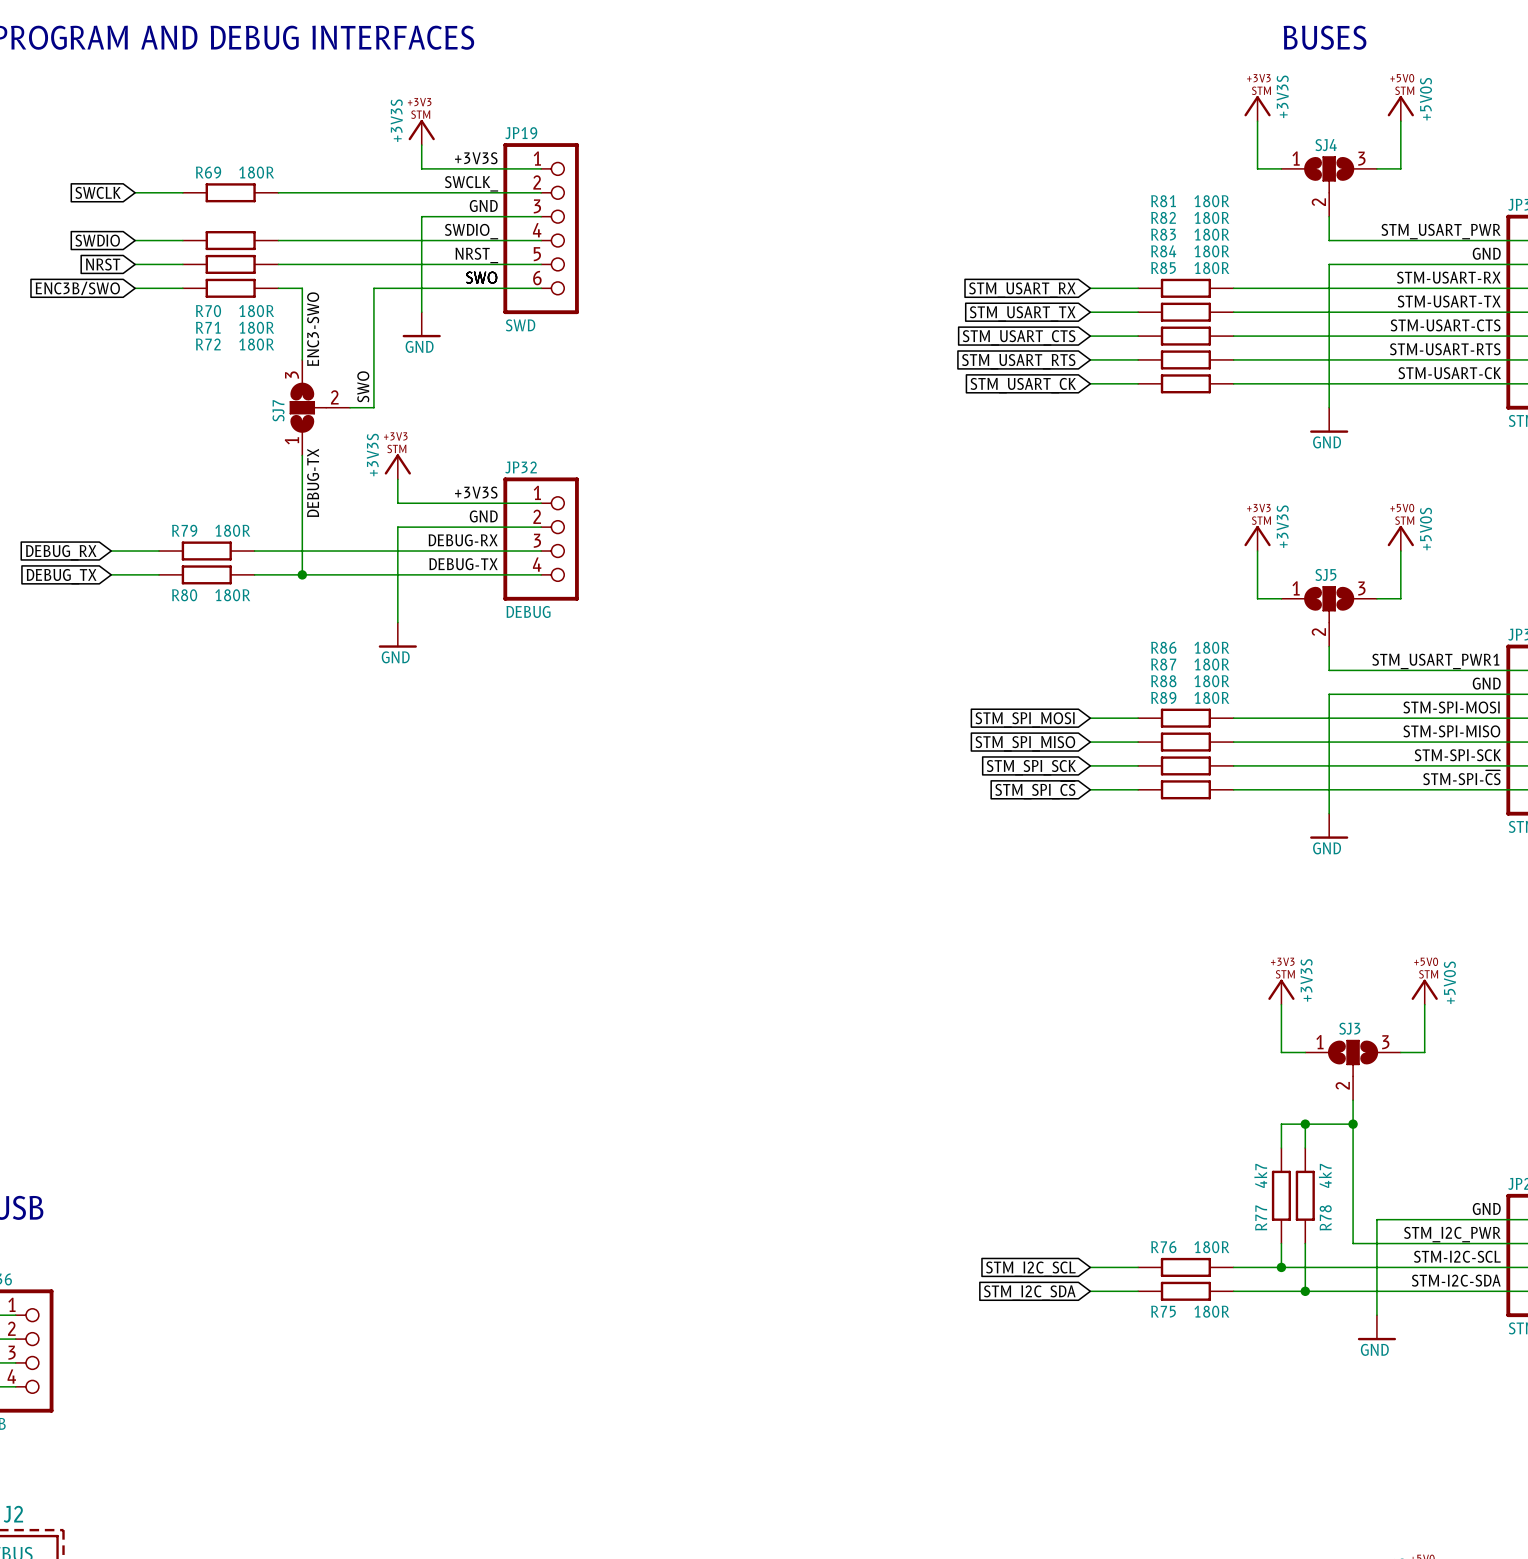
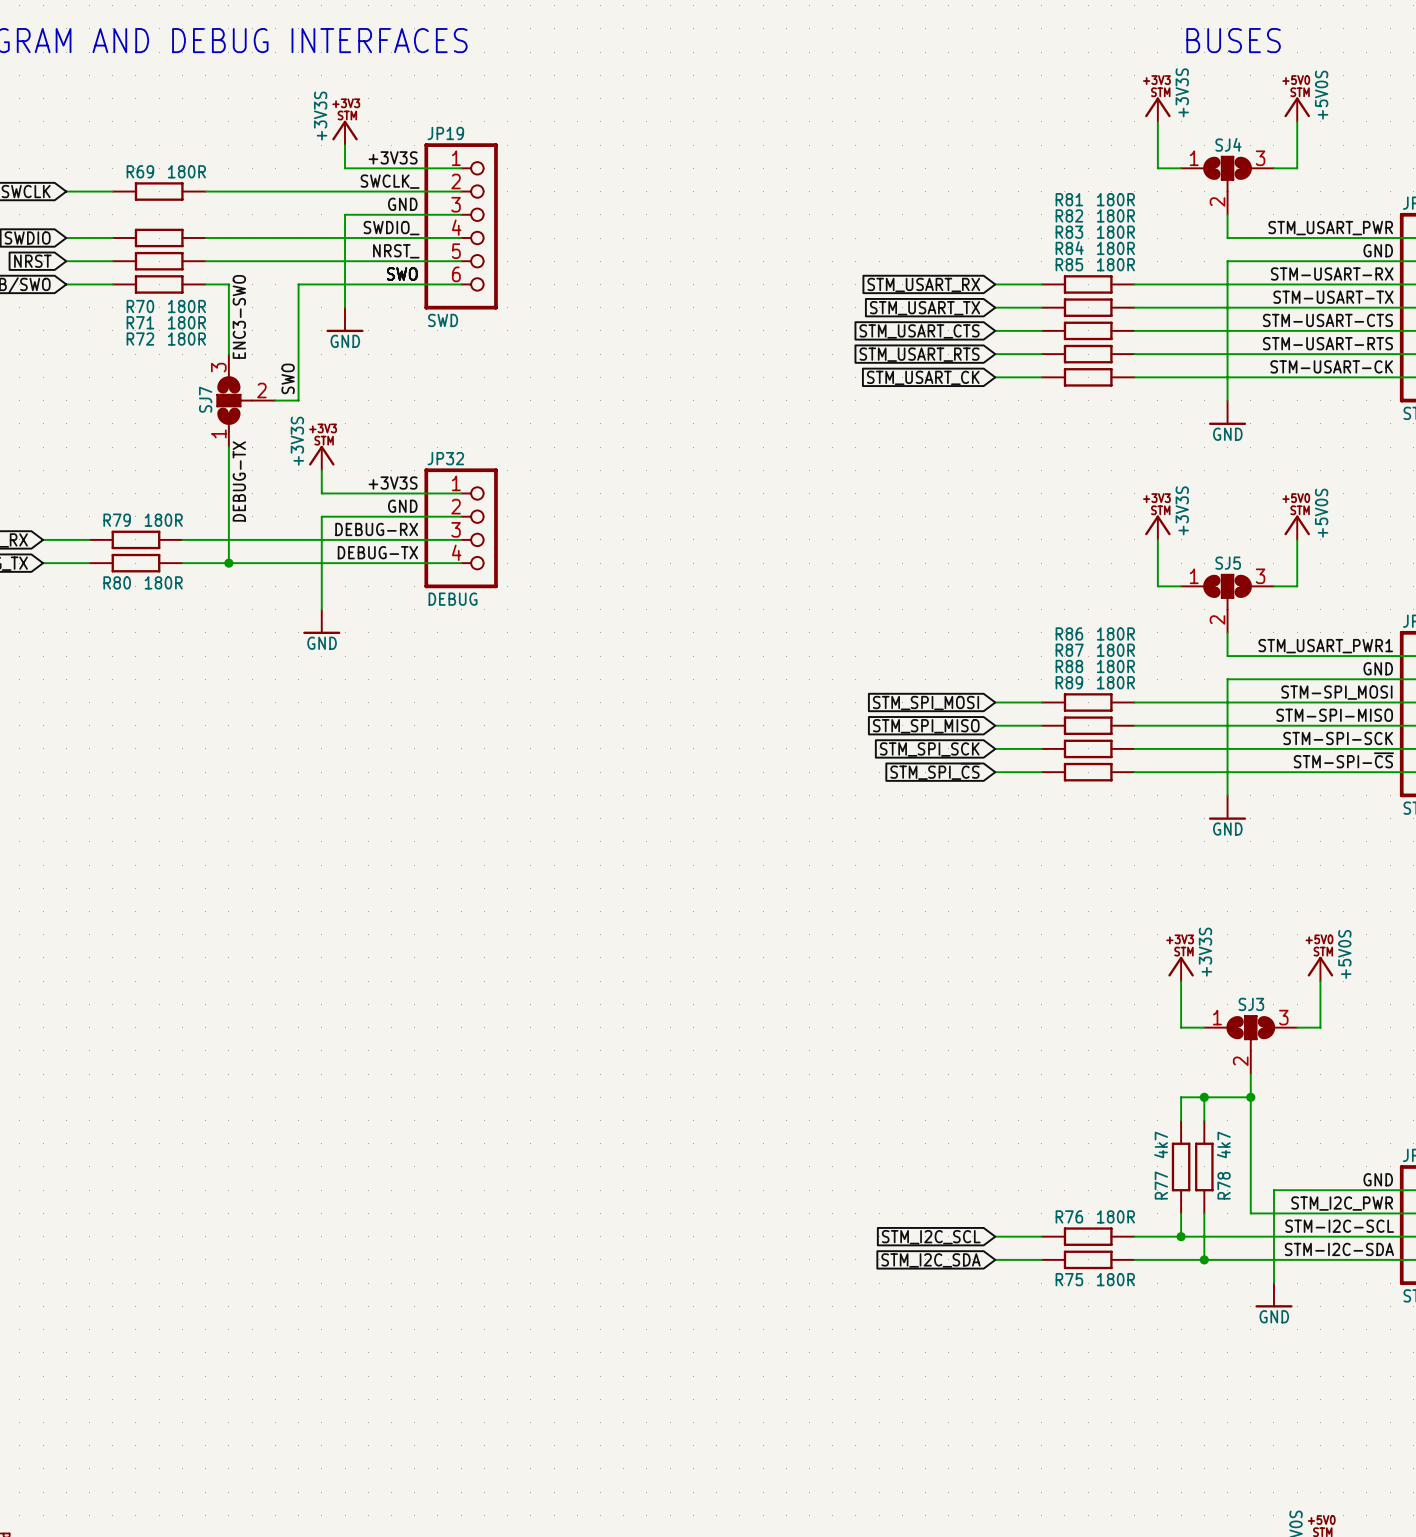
label: STM-SPI-MOSI (1451, 707) -> STM-SPI_MOSI (1336, 692)

